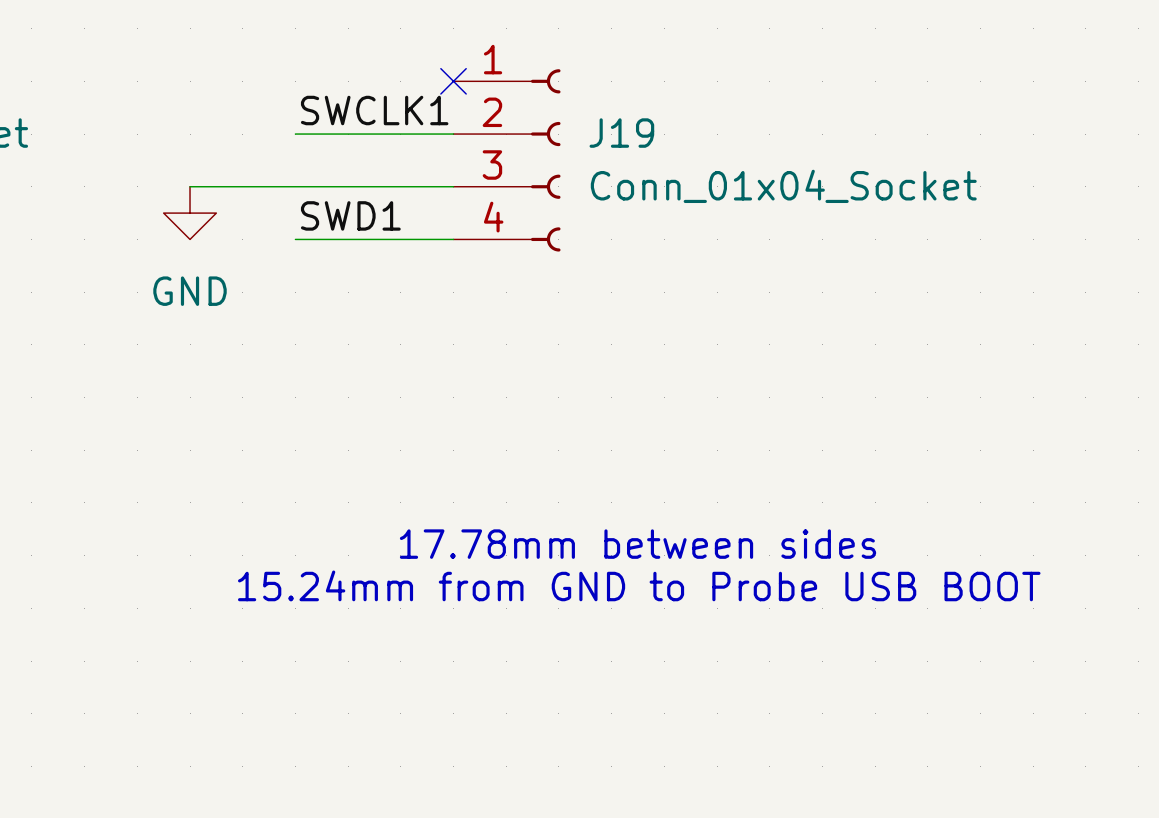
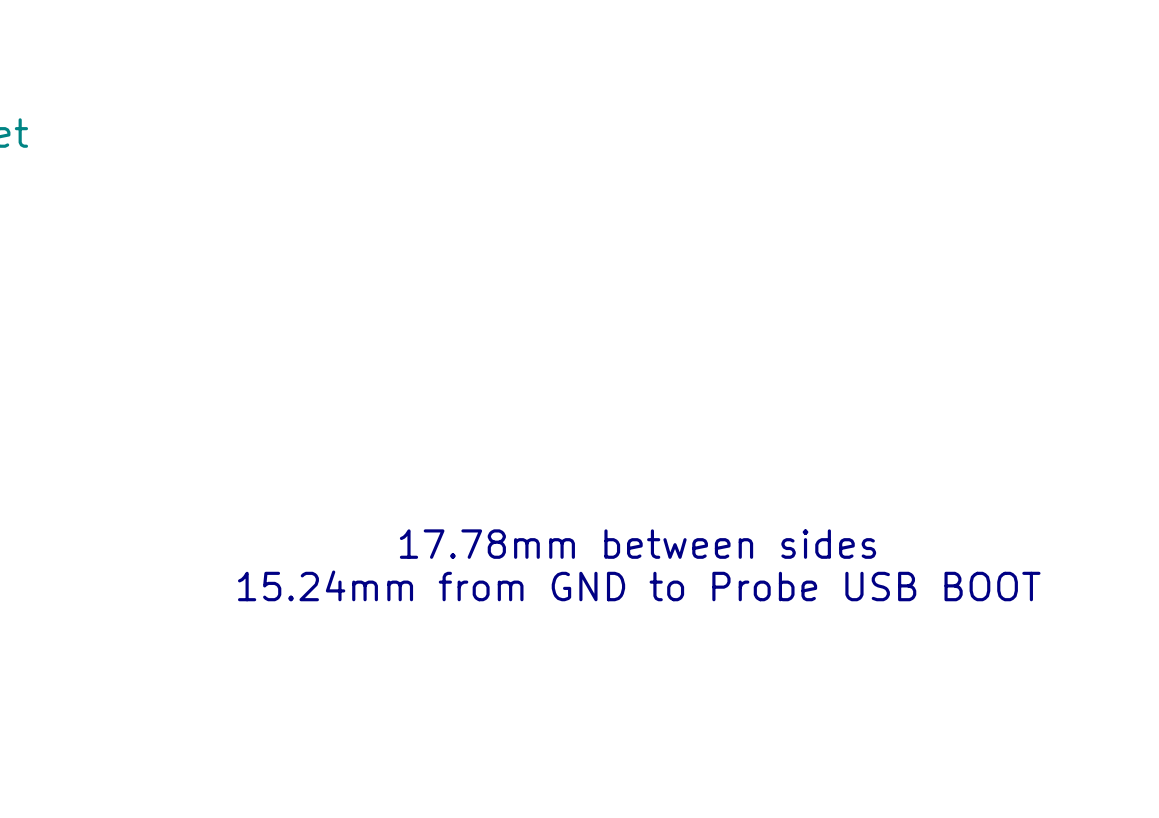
no-connect mark: (453, 81) -> none
label: SWCLK1 (374, 110) -> none
wire: (295, 134) (453, 134) -> none
J19: Conn_01x04_Socket (507, 160) -> none
wire: (190, 186) (453, 186) -> none
power symbol: GND (190, 213) -> none
label: SWD1 (350, 215) -> none
wire: (295, 239) (453, 239) -> none

